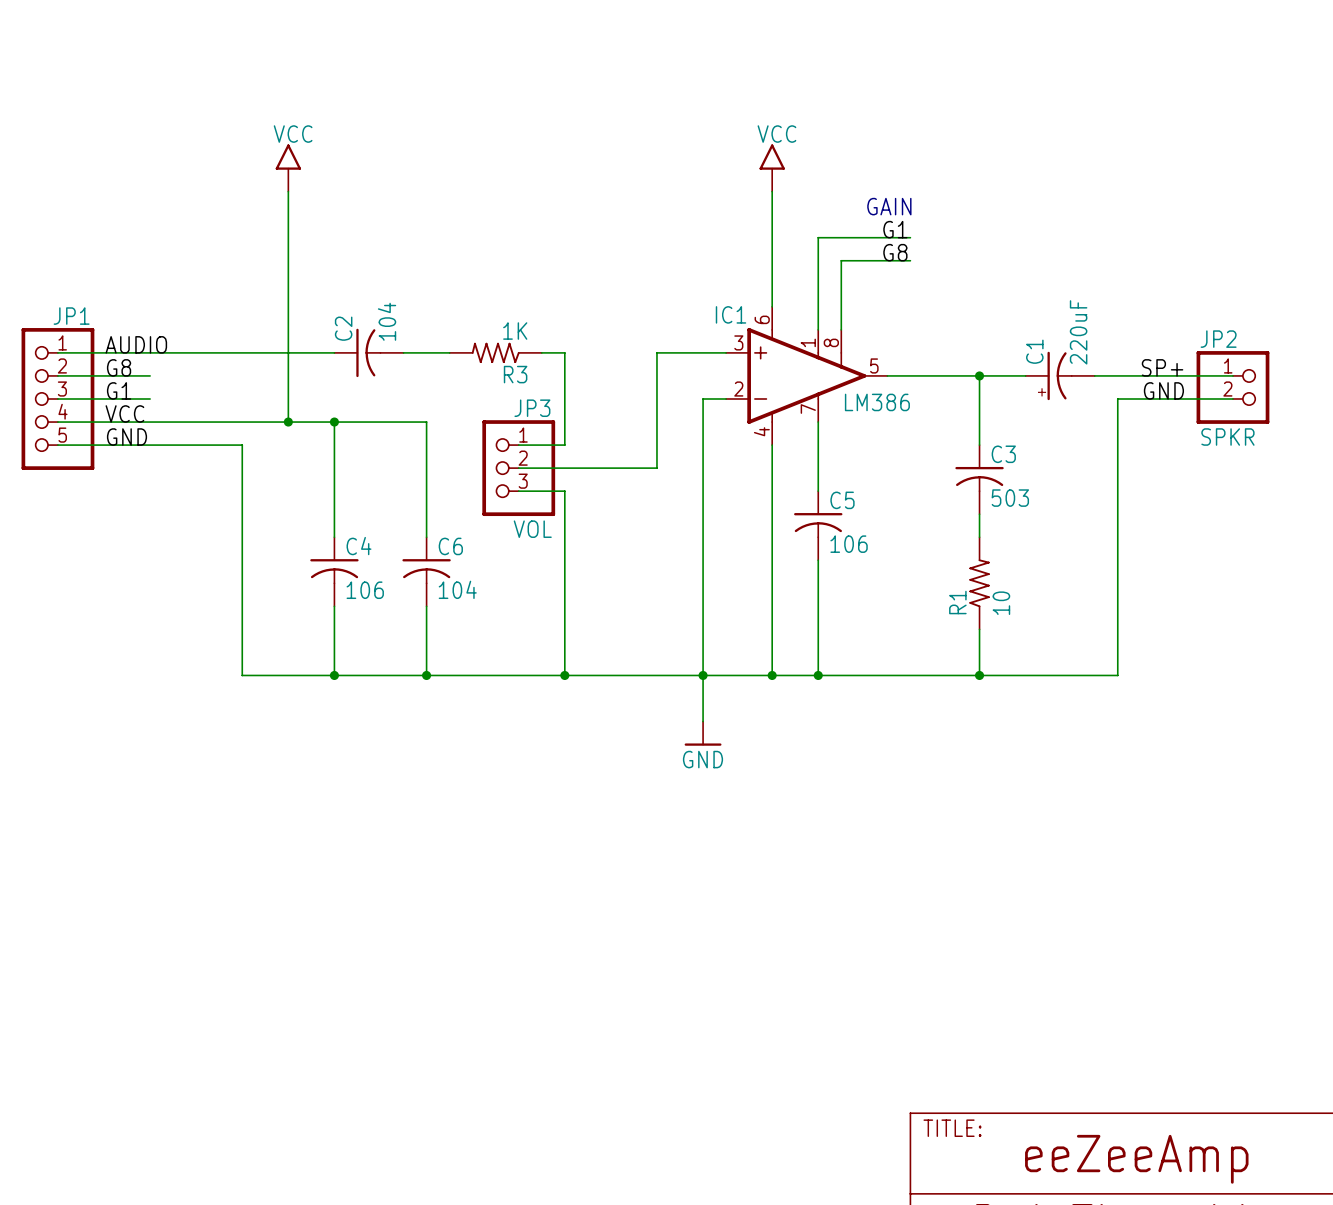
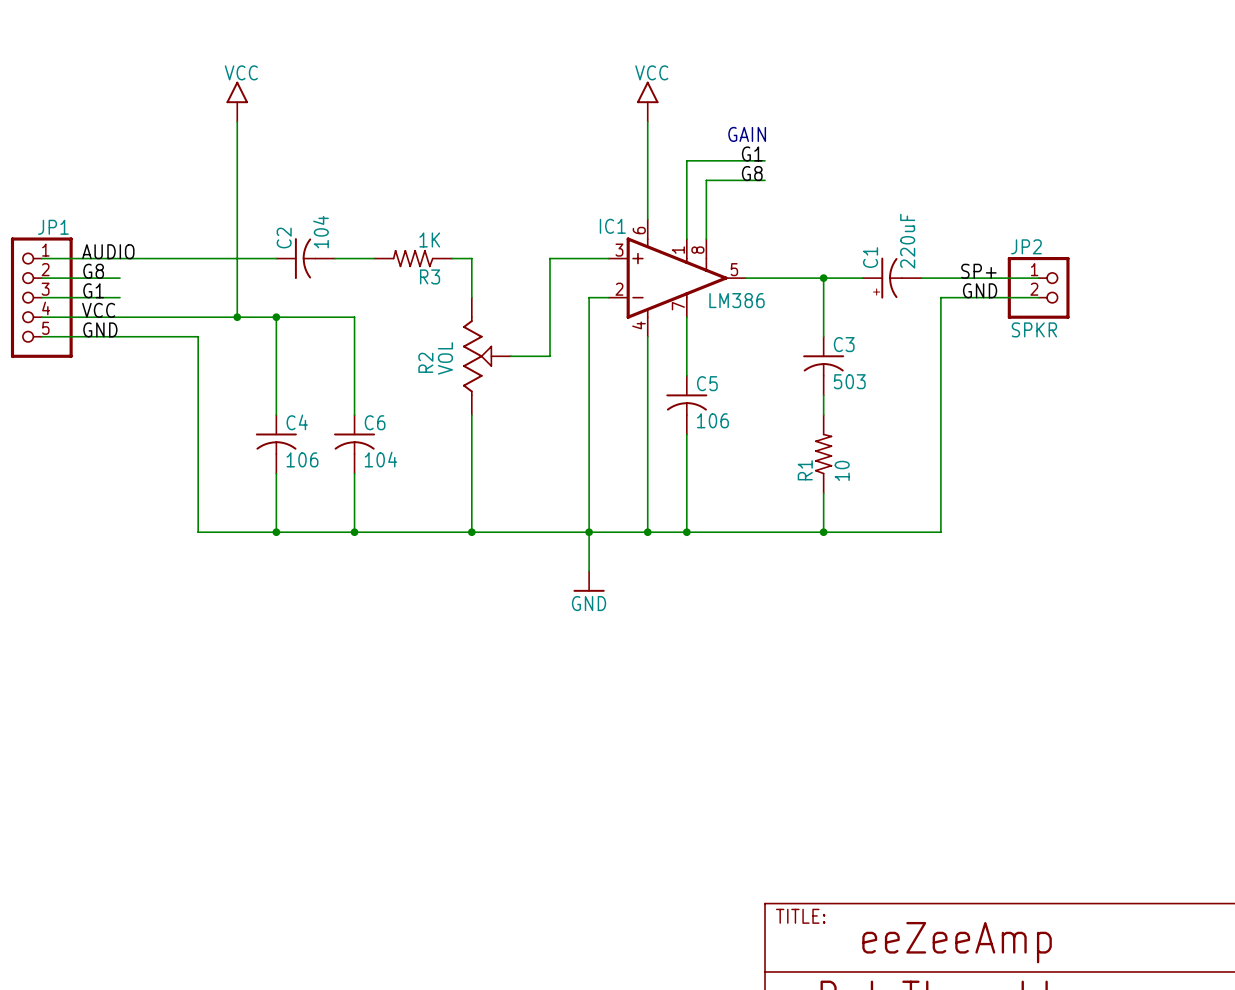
wire: (564, 398) (564, 445) (518, 445) -> none
wire: (518, 468) (610, 468) -> none
JP3: VOL (518, 468) -> none
R2: none -> VOL (486, 356)
wire: (518, 491) (564, 491) (564, 537) -> none

